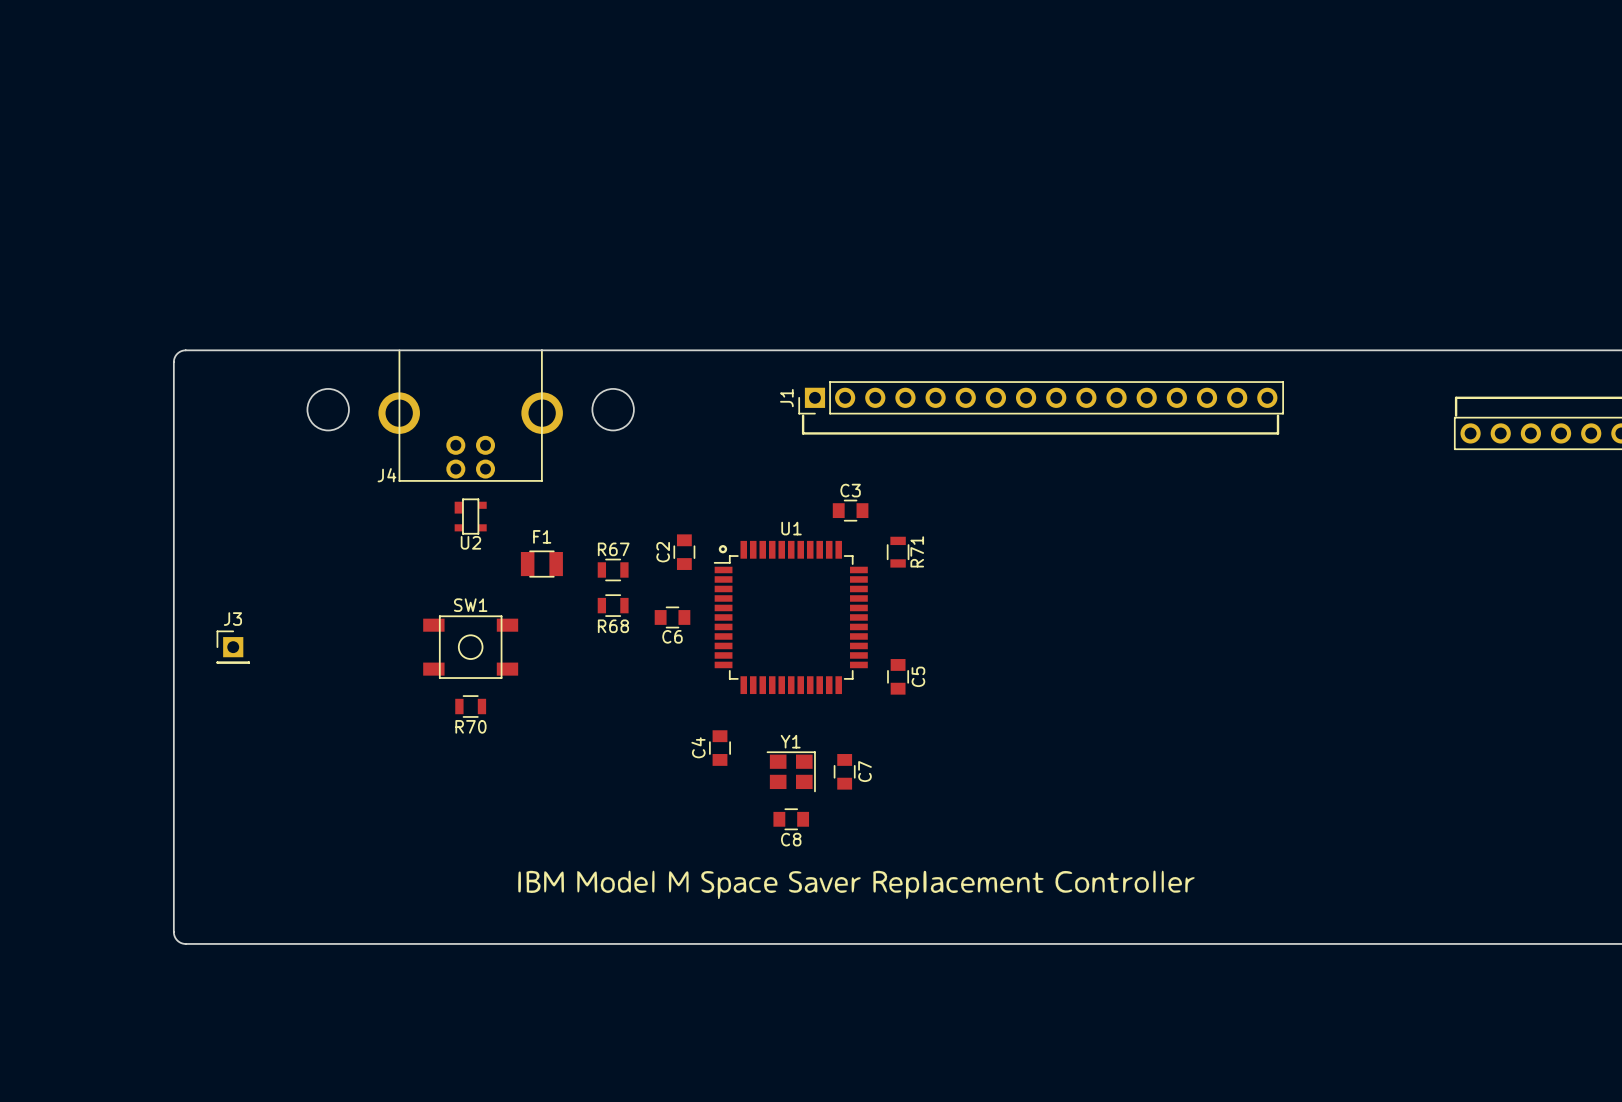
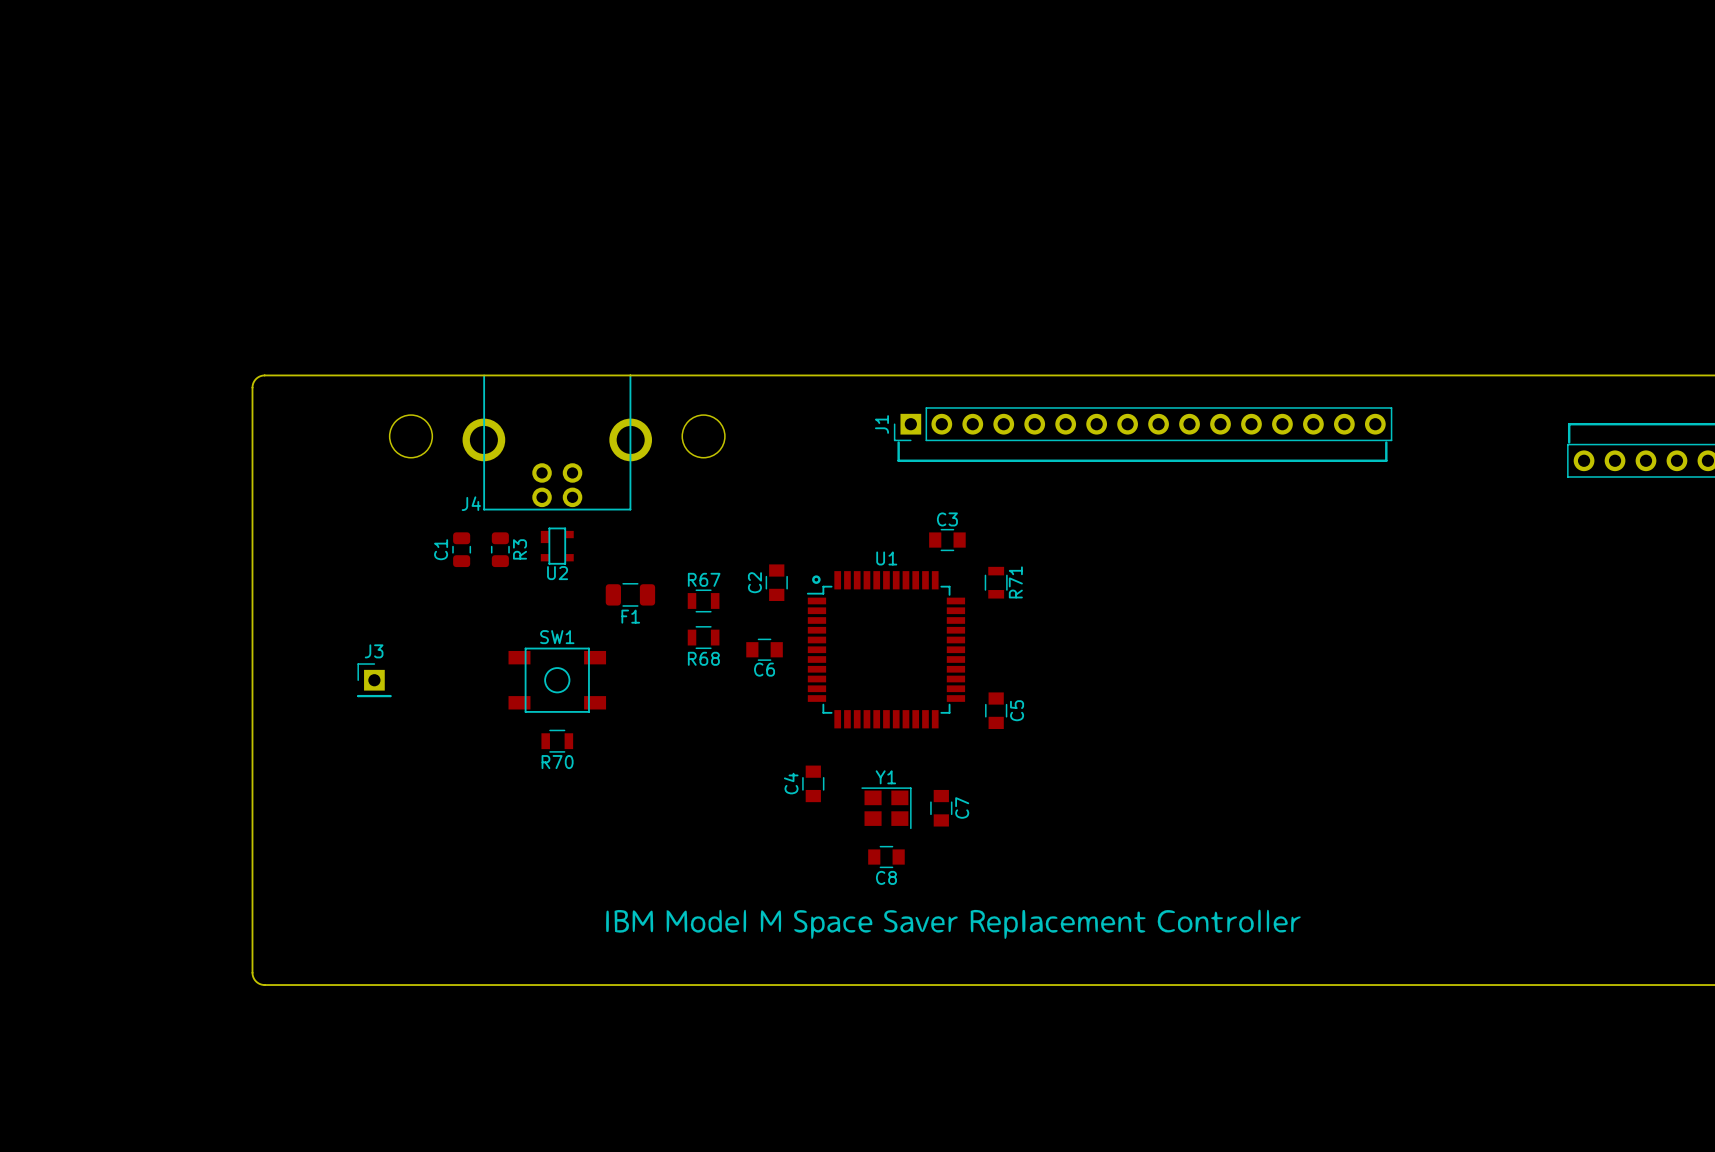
C1: none -> (461, 549)
R3: none -> (500, 549)
F1 name position: F1 (542, 536) -> F1 (630, 616)
F1 footprint: [520, 550, 563, 578] -> [605, 583, 656, 607]
J3 position: (233, 647) -> (374, 680)

